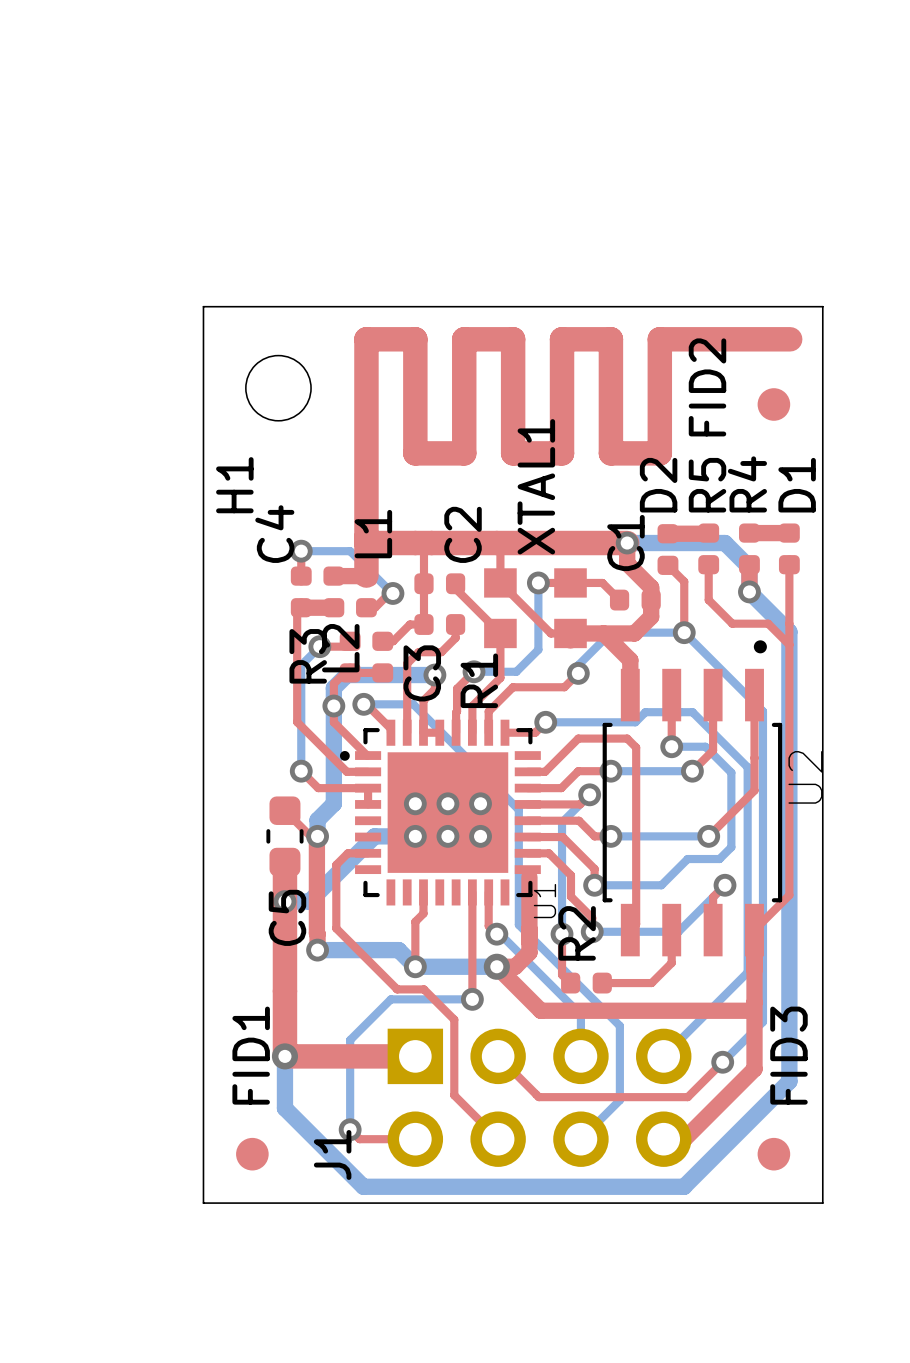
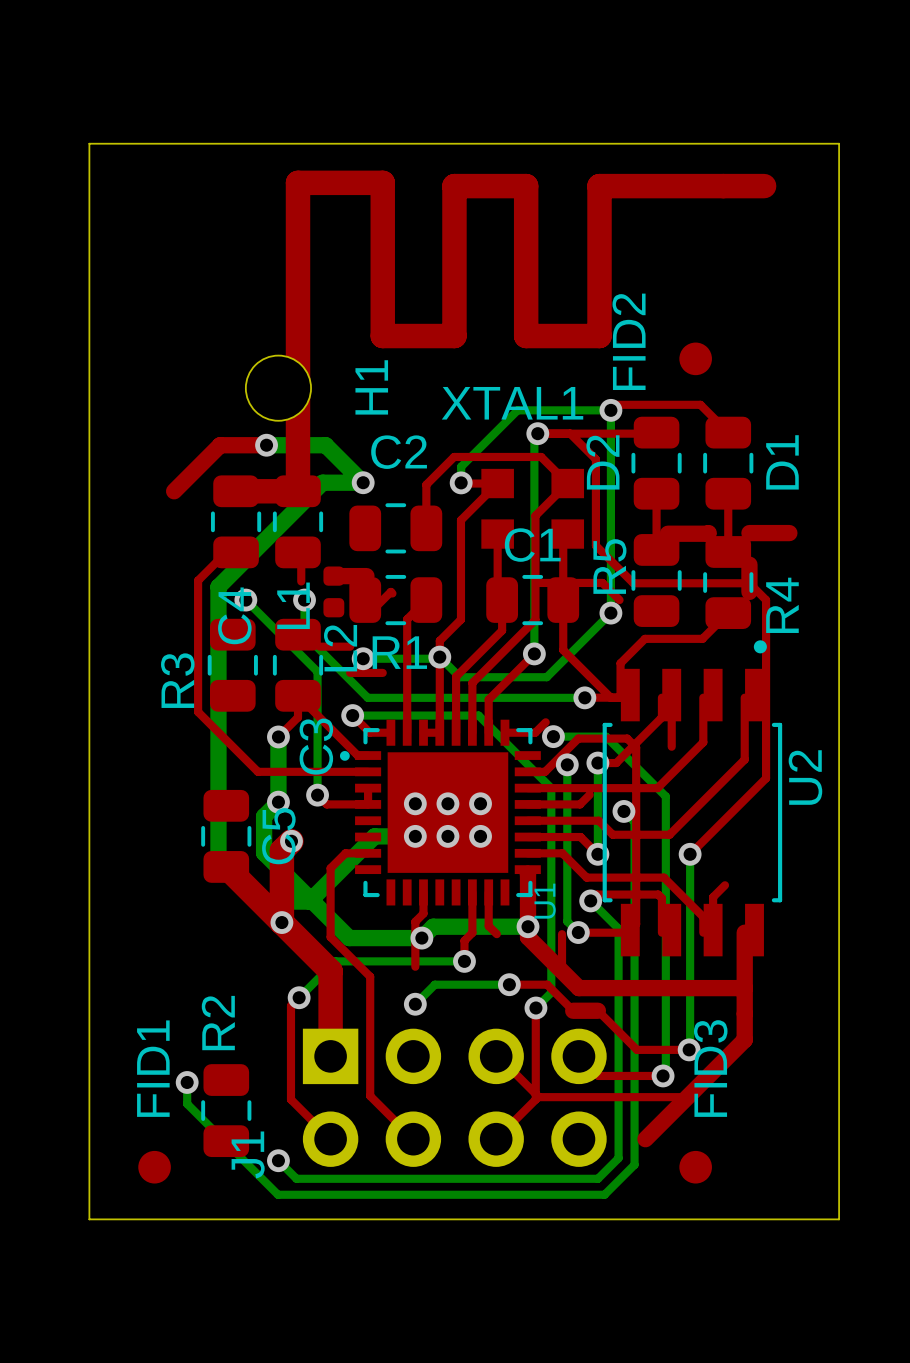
top track: none -> (764, 186) (599, 186) (599, 336) (526, 336) (526, 186) (454, 186) (454, 336) (382, 336) (382, 182) (298, 182) (298, 491) (236, 491)
board edge: (203, 306) (822, 306) (822, 1203) (203, 1203) (203, 306) -> (89, 143) (89, 1219) (839, 1219) (839, 143) (89, 143)
top track: (790, 339) (659, 339) (659, 453) (610, 453) (610, 339) (562, 339) (562, 453) (513, 453) (513, 339) (464, 339) (464, 453) (415, 453) (415, 339) (366, 339) (366, 575) -> none
FID2 position: (773, 404) -> (695, 358)
top track: none -> (610, 410) (616, 404) (700, 404) (728, 432)
via: none -> (610, 410)
top track: none -> (656, 432) (537, 433)
bottom track: none -> (537, 433) (534, 437) (534, 653)
via: none -> (537, 433)
top track: none -> (570, 433) (595, 459) (595, 545) (633, 583) (749, 583) (766, 600) (766, 778) (690, 854)
top track: none -> (266, 445) (220, 445) (174, 491)
bottom track: none -> (266, 445) (325, 445) (363, 482) (322, 482) (218, 586) (218, 859) (281, 922)
via: none -> (266, 445)
via: none -> (363, 482)
top track: none -> (461, 482) (497, 483) (460, 520) (460, 619) (439, 640) (439, 732)
bottom track: none -> (461, 482) (461, 466) (517, 410) (610, 410) (610, 613) (546, 677) (459, 677) (439, 657) (438, 658) (363, 658)
via: none -> (461, 482)
R4 name position: R4 (747, 484) -> R4 (782, 605)
H1 name position: H1 (234, 485) -> H1 (371, 387)
D2 name position: D2 (658, 485) -> D2 (602, 462)
R5 name position: R5 (707, 485) -> R5 (609, 566)
D1 name position: D1 (797, 485) -> D1 (782, 462)
XTAL1 name rotation: 0° (536, 486) -> 90° clockwise (512, 403)
top track: none -> (656, 493) (656, 549)
top track: none -> (728, 493) (728, 551)
R5 footprint: [698, 523, 720, 575] -> [631, 534, 682, 627]
R4 footprint: [739, 523, 760, 575] -> [703, 536, 754, 629]
D1 footprint: [778, 523, 800, 575] -> [703, 416, 754, 510]
D2 footprint: [657, 524, 679, 575] -> [631, 416, 682, 510]
C4 name position: C4 (274, 534) -> C4 (234, 615)
L1 name position: L1 (373, 534) -> L1 (293, 605)
top track: none -> (567, 534) (563, 538) (563, 650) (610, 697)
top track: (366, 543) (627, 543) (627, 563) (651, 587) (651, 616) (634, 633) (570, 633) -> none
top track: (415, 543) (423, 551) (423, 624) (409, 624) (393, 641) (382, 641) -> none
top track: (496, 543) (500, 546) (500, 582) (550, 633) (570, 633) -> none
bottom track: (627, 543) (725, 543) (749, 567) (749, 591) (789, 631) (789, 1081) (684, 1186) -> none
via: (627, 543) -> none
bottom track: (301, 551) (350, 551) (390, 591) -> none
via: (301, 551) -> none
top track: (708, 564) (708, 600) (732, 623) (768, 623) (789, 644) -> none
top track: (789, 564) (789, 895) (754, 930) (754, 1069) (684, 1139) (663, 1139) -> none
top track: (667, 565) (684, 581) (684, 632) -> none
C4 footprint: [290, 566, 312, 618] -> [210, 475, 262, 569]
L1 footprint: [356, 566, 377, 618] -> [272, 475, 324, 569]
C2 footprint: [414, 573, 466, 595] -> [349, 503, 443, 554]
bottom track: (538, 582) (538, 649) (516, 671) (474, 671) -> none
via: (538, 582) -> none
top track: (455, 583) (455, 588) (500, 633) (500, 677) (472, 705) -> (426, 528) (426, 484) (454, 456) (541, 456) (567, 483) (535, 515) (535, 619) (472, 682) (472, 705)
C1 footprint: [609, 589, 661, 611] -> [486, 574, 580, 626]
via: (749, 591) -> none
via: (392, 593) -> none
bottom track: none -> (245, 600) (317, 671) (317, 795)
via: none -> (245, 600)
bottom track: none -> (304, 600) (304, 634) (367, 697) (584, 697)
via: none -> (304, 600)
top track: (333, 607) (301, 607) (297, 611) (297, 722) (346, 771) -> (226, 552) (198, 580) (198, 711) (257, 771) (346, 771)
XTAL1 position: (535, 608) -> (532, 508)
via: none -> (610, 613)
top track: none -> (728, 613) (702, 638) (644, 638) (620, 663) (620, 697) (585, 697)
R1 footprint: [414, 614, 466, 635] -> [349, 574, 443, 626]
top track: (455, 624) (455, 638) (441, 652) (418, 652) (407, 663) -> (426, 600) (407, 619) (407, 663)
R3 footprint: [339, 631, 361, 683] -> [207, 618, 258, 712]
C3 footprint: [372, 631, 394, 683] -> [272, 618, 324, 712]
via: (684, 632) -> none
top track: (603, 633) (630, 660) (630, 695) -> none
bottom track: (319, 646) (301, 665) (301, 771) -> none
via: (319, 646) -> none
via: none -> (534, 653)
via: none -> (363, 658)
top track: (350, 667) (333, 683) (333, 722) (367, 755) -> (278, 736) (298, 717) (298, 695) (357, 755) (367, 755)
top track: (474, 671) (457, 688) (456, 712) -> (497, 534) (497, 595) (502, 600) (502, 630) (456, 676) (456, 712)
via: (474, 671) -> none
C3 name position: C3 (422, 673) -> C3 (316, 746)
top track: (578, 673) (564, 687) (512, 687) (488, 711) -> (534, 653) (488, 699) (488, 711)
bottom track: (578, 673) (578, 665) (610, 632) (684, 632) (762, 711) (762, 1021) (722, 1062) -> none
via: (578, 673) -> none
top track: (434, 675) (434, 689) (423, 700) (423, 732) -> none
bottom track: (434, 675) (346, 675) (333, 688) (333, 803) (317, 820) (317, 836) -> none
via position: (434, 675) -> (439, 657)
top track: (713, 695) (713, 750) (692, 771) -> none
top track: (754, 695) (754, 790) (708, 836) -> none
via: none -> (584, 697)
top track: none -> (661, 697) (661, 717) (616, 763) (597, 763)
top track: (363, 704) (366, 704) (390, 728) (390, 732) -> (352, 715) (369, 732) (390, 732)
bottom track: (363, 704) (413, 704) (518, 809) (518, 924) (619, 1025) (619, 1100) (580, 1139) -> none
via: (363, 704) -> none
via: (333, 706) -> none
bottom track: none -> (352, 715) (478, 715) (551, 788) (551, 992) (535, 1007)
via: none -> (352, 715)
bottom track: (545, 722) (635, 722) (645, 712) (692, 712) (747, 767) (747, 972) (663, 1056) -> none
via position: (545, 722) -> (553, 736)
bottom track: none -> (278, 736) (278, 802) (264, 816) (264, 853) (349, 938) (421, 938) (433, 926) (528, 926) (526, 925)
via: none -> (278, 736)
bottom track: none -> (553, 736) (605, 736) (665, 796) (665, 1073) (663, 1075)
bottom track: (671, 746) (705, 746) (731, 772) (731, 847) (719, 859) (687, 859) (661, 885) (594, 885) -> none
via: (671, 746) -> none
bottom track: none -> (597, 763) (597, 854)
bottom track: none -> (567, 764) (567, 921) (578, 932)
via: none -> (567, 764)
top track: (301, 771) (318, 788) (368, 788) -> none
via: (301, 771) -> none
top track: (610, 771) (578, 771) (561, 788) -> (703, 697) (703, 742) (657, 788) (561, 788)
bottom track: (610, 771) (692, 771) -> none
via position: (610, 771) -> (597, 763)
via: (692, 771) -> none
bottom track: (589, 794) (562, 822) (562, 934) -> none
via: (589, 794) -> none
top track: none -> (317, 795) (326, 804) (368, 804)
via: none -> (317, 795)
C5 footprint: [266, 796, 304, 877] -> [201, 789, 252, 883]
via: none -> (278, 802)
top track: (284, 810) (310, 836) (317, 836) (317, 950) -> none
bottom track: none -> (623, 811) (634, 822) (634, 1164) (604, 1194) (278, 1194) (187, 1103) (187, 1082)
via: none -> (623, 811)
top track: (578, 820) (594, 836) (610, 836) -> (578, 820) (598, 820) (612, 834) (669, 834) (744, 759) (744, 697)
via: (317, 836) -> none
bottom track: (610, 836) (708, 836) -> none
via position: (610, 836) -> (597, 854)
via position: (708, 836) -> (690, 854)
top track: (562, 837) (594, 868) (594, 885) -> (562, 837) (580, 837) (597, 854)
top track: none -> (291, 841) (281, 850) (281, 922)
via: none -> (291, 841)
top track: (347, 853) (336, 864) (336, 928) (397, 989) (424, 989) (454, 1019) (454, 1095) (498, 1139) -> (347, 853) (345, 853) (330, 868) (330, 937) (370, 976) (370, 1096) (413, 1139)
top track: (548, 853) (570, 875) (570, 896) (592, 917) (592, 931) -> (548, 853) (562, 853) (586, 877) (663, 877) (703, 916) (703, 932)
bottom track: none -> (690, 854) (689, 1049)
top track: (284, 862) (284, 1056) (415, 1056) -> none
top track: none -> (226, 866) (330, 971) (330, 1056)
top track: none -> (528, 873) (528, 937) (578, 988) (744, 988)
top track: (529, 877) (529, 952) (515, 966) (496, 966) (540, 1010) (573, 1010) -> (509, 984) (547, 984) (573, 1010)
via position: (594, 885) -> (590, 900)
bottom track: (725, 885) (678, 931) (592, 931) -> none
via: (725, 885) -> none
top track: none -> (590, 900) (597, 894) (658, 894) (661, 898) (661, 932)
bottom track: none -> (590, 900) (618, 928) (618, 1158) (597, 1178) (296, 1178) (278, 1160)
via position: (284, 901) -> (281, 922)
C5 name position: C5 (287, 917) -> C5 (278, 836)
via: none -> (528, 926)
top track: (671, 930) (671, 963) (651, 983) (602, 983) -> none
via: (592, 931) -> none
top track: (472, 932) (472, 999) -> (472, 932) (464, 940) (464, 961)
top track: none -> (578, 932) (620, 932)
via: none -> (578, 932)
top track: none -> (744, 932) (744, 1039) (722, 1062)
bottom track: (496, 934) (500, 934) (580, 1014) (580, 1056) -> none
via: (496, 934) -> none
via: (562, 934) -> none
via: none -> (421, 938)
bottom track: (317, 950) (398, 950) (415, 966) (496, 966) -> none
via: (317, 950) -> none
bottom track: none -> (464, 961) (335, 961) (299, 997)
via: none -> (464, 961)
via: (415, 966) -> none
via position: (496, 966) -> (509, 984)
R2 footprint: [561, 972, 612, 994] -> [201, 1064, 252, 1158]
bottom track: none -> (509, 984) (434, 984) (415, 1004)
top track: none -> (299, 997) (290, 1005) (290, 1099) (330, 1139)
via: none -> (299, 997)
bottom track: (472, 999) (390, 999) (350, 1040) (350, 1129) -> none
via: (472, 999) -> none
via: none -> (415, 1004)
via: none -> (535, 1007)
top track: none -> (535, 1008) (535, 1099) (496, 1139)
top track: (597, 1010) (751, 1010) -> (597, 1010) (636, 1049) (689, 1049)
via: none -> (689, 1049)
bottom track: (284, 1056) (284, 1108) (363, 1186) (684, 1186) -> none
via: (284, 1056) -> none
top track: none -> (578, 1056) (598, 1075) (663, 1075)
top track width: thin (722, 1062) (687, 1097) -> thick (722, 1062) (687, 1097)
via: (722, 1062) -> none
via: none -> (663, 1075)
via: none -> (187, 1082)
J1 position: (539, 1097) -> (454, 1097)
top track: (350, 1129) (359, 1139) (415, 1139) -> none
via: (350, 1129) -> none
FID1 position: (252, 1154) -> (154, 1167)
FID3 position: (773, 1154) -> (695, 1167)
via: none -> (278, 1160)

